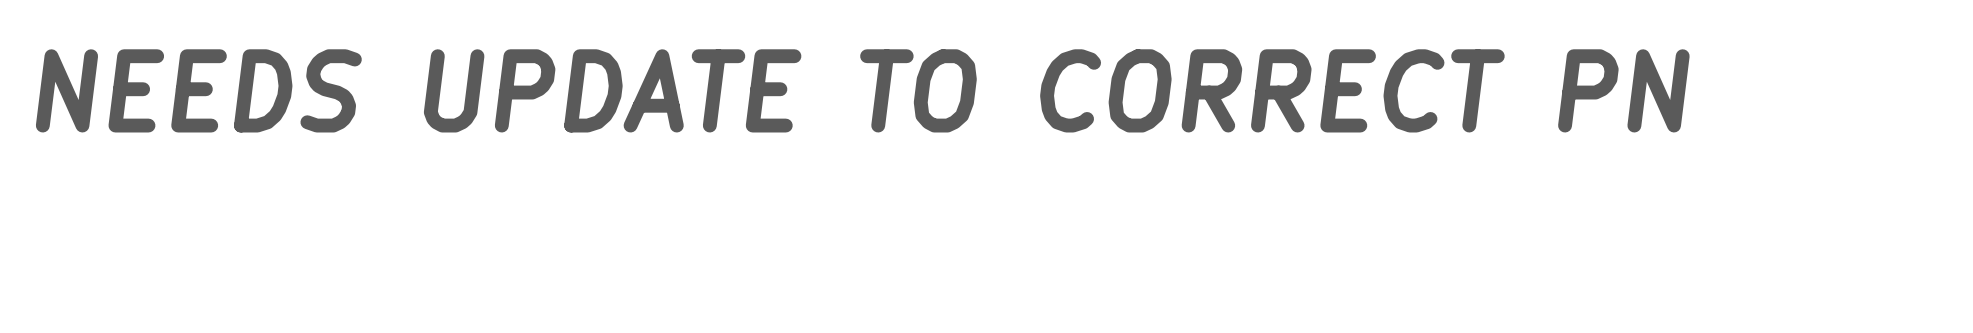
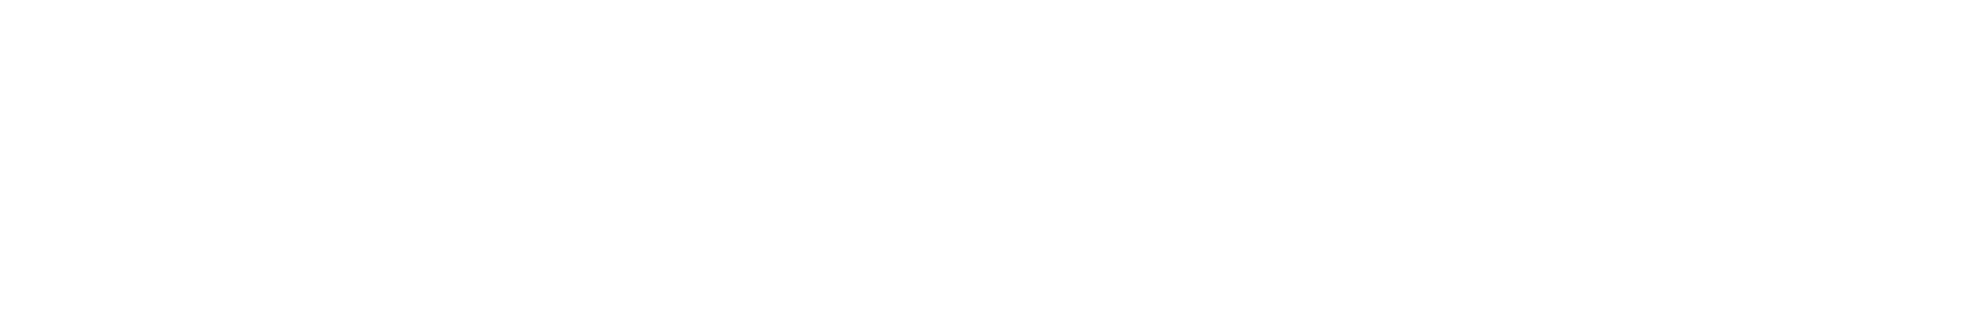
text: NEEDS UPDATE TO CORRECT PN (862, 90) -> none

